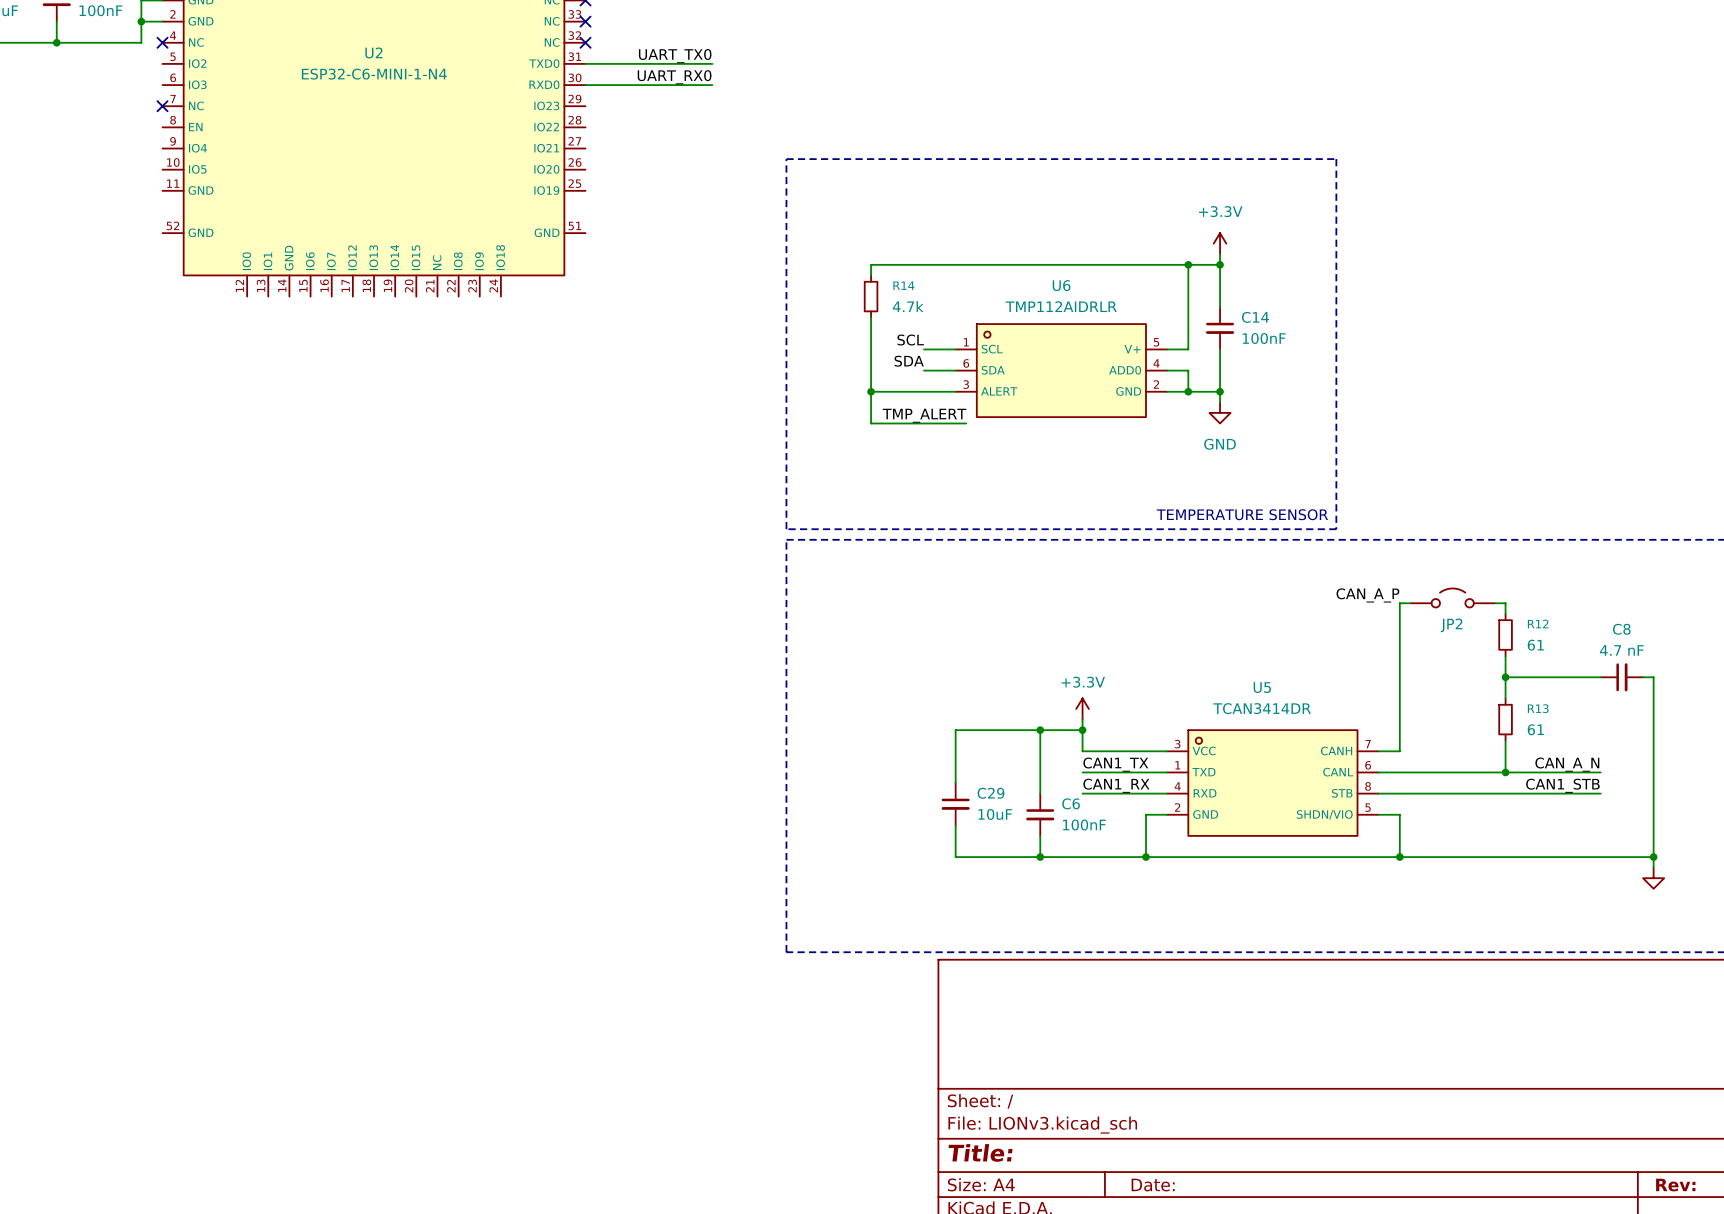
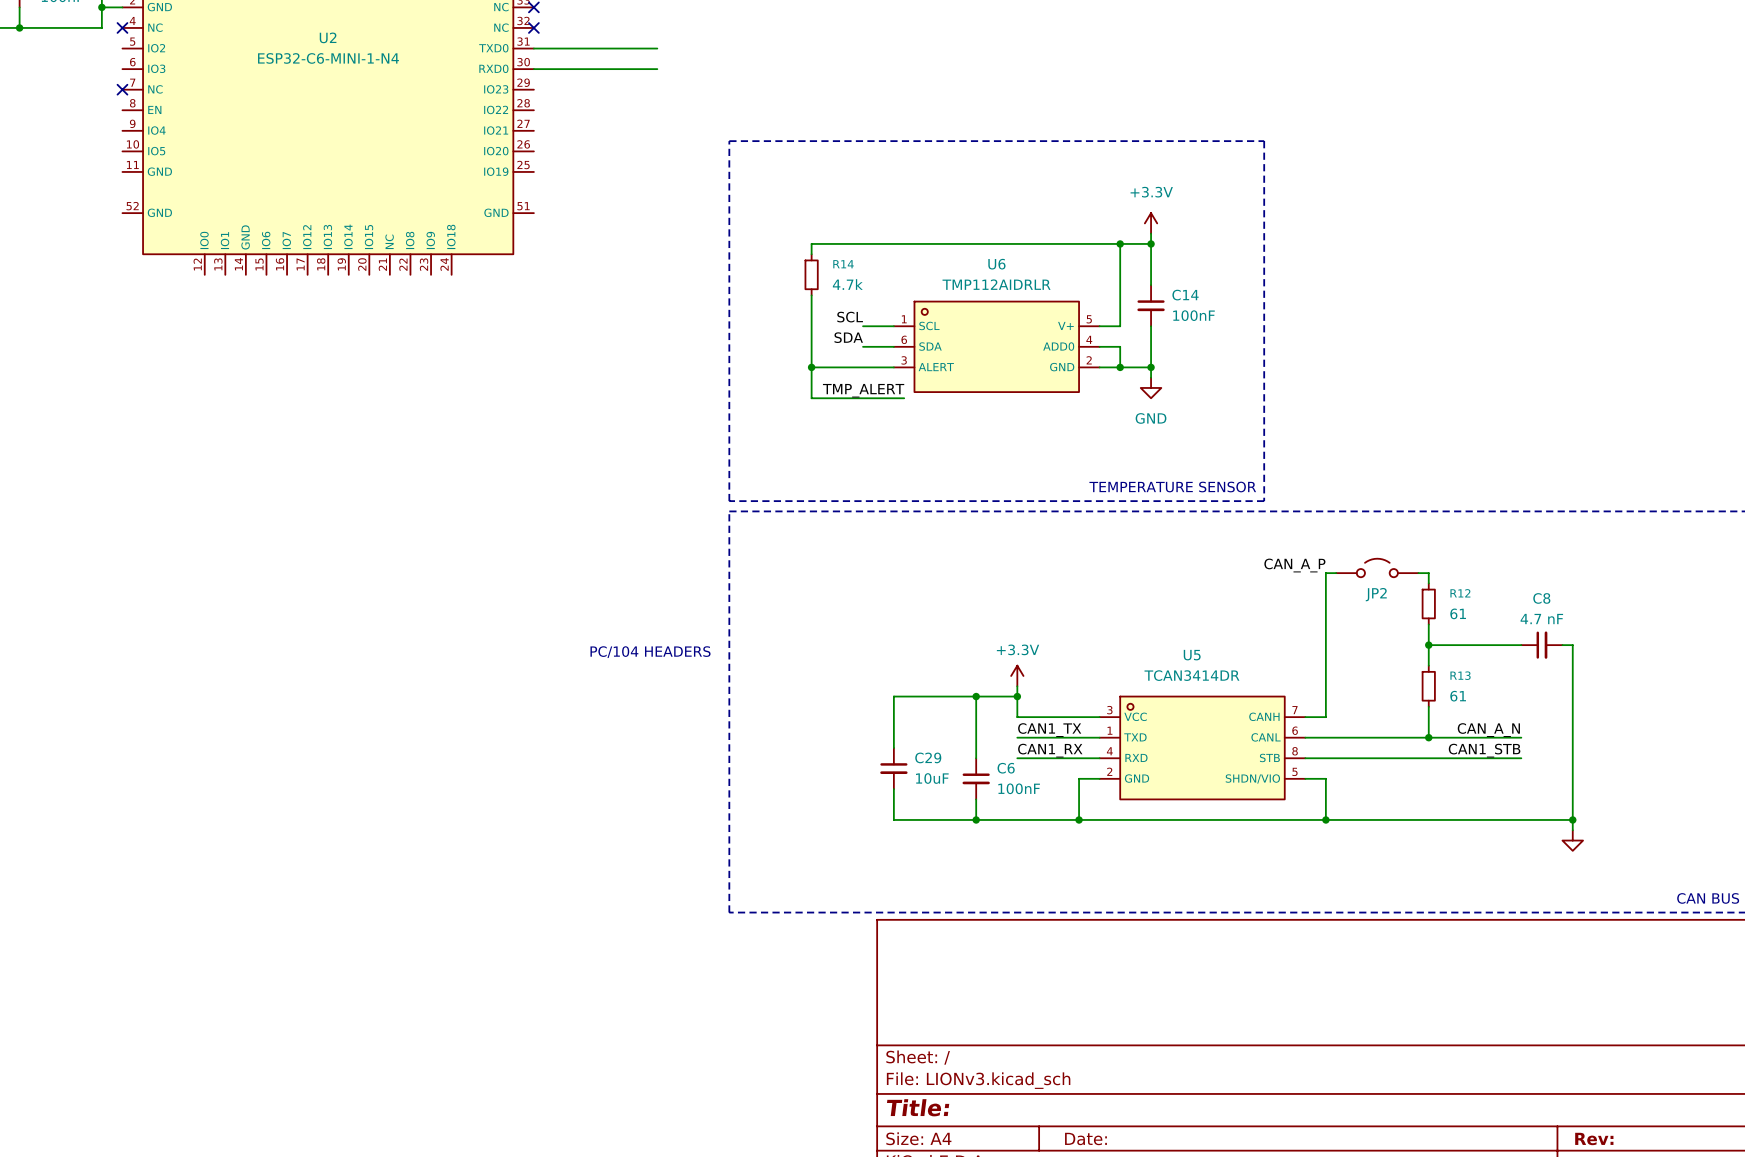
label: UART_TX0 (675, 56) -> none
label: UART_RX0 (674, 77) -> none
text: none -> PC/104 HEADERS (650, 652)

